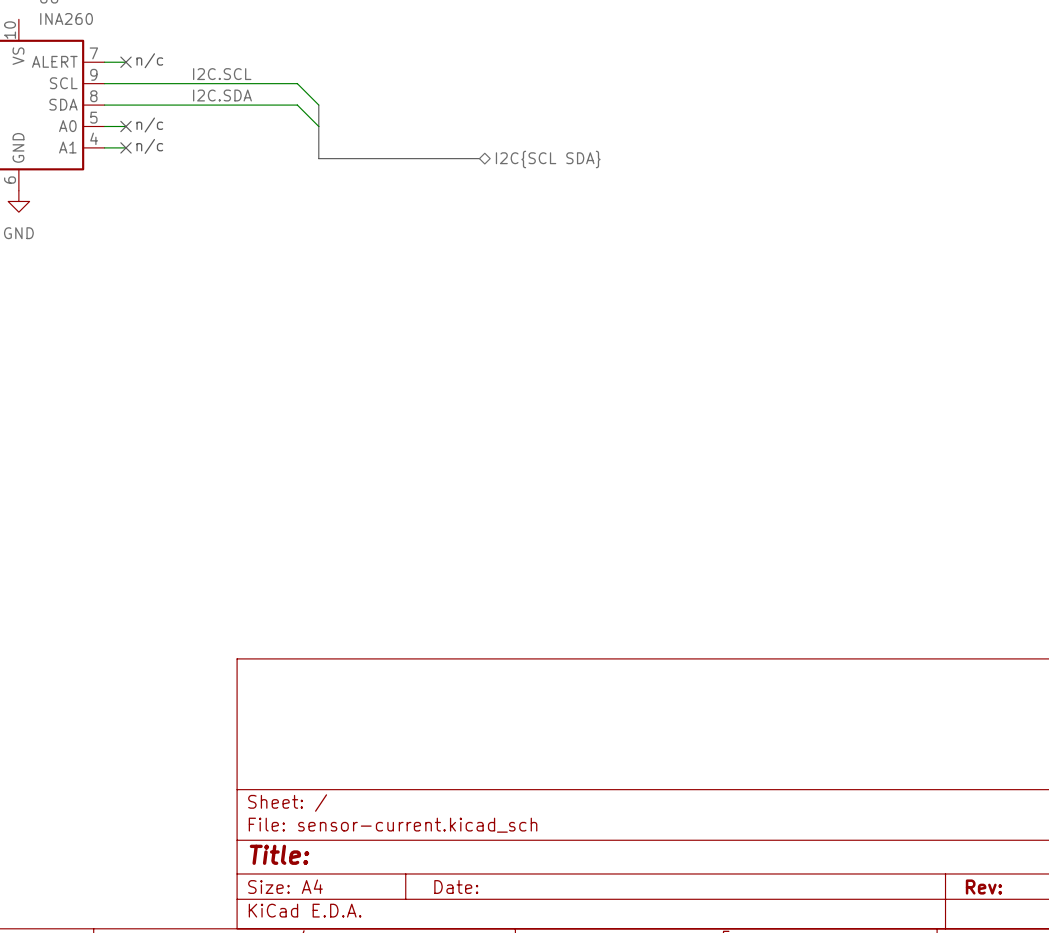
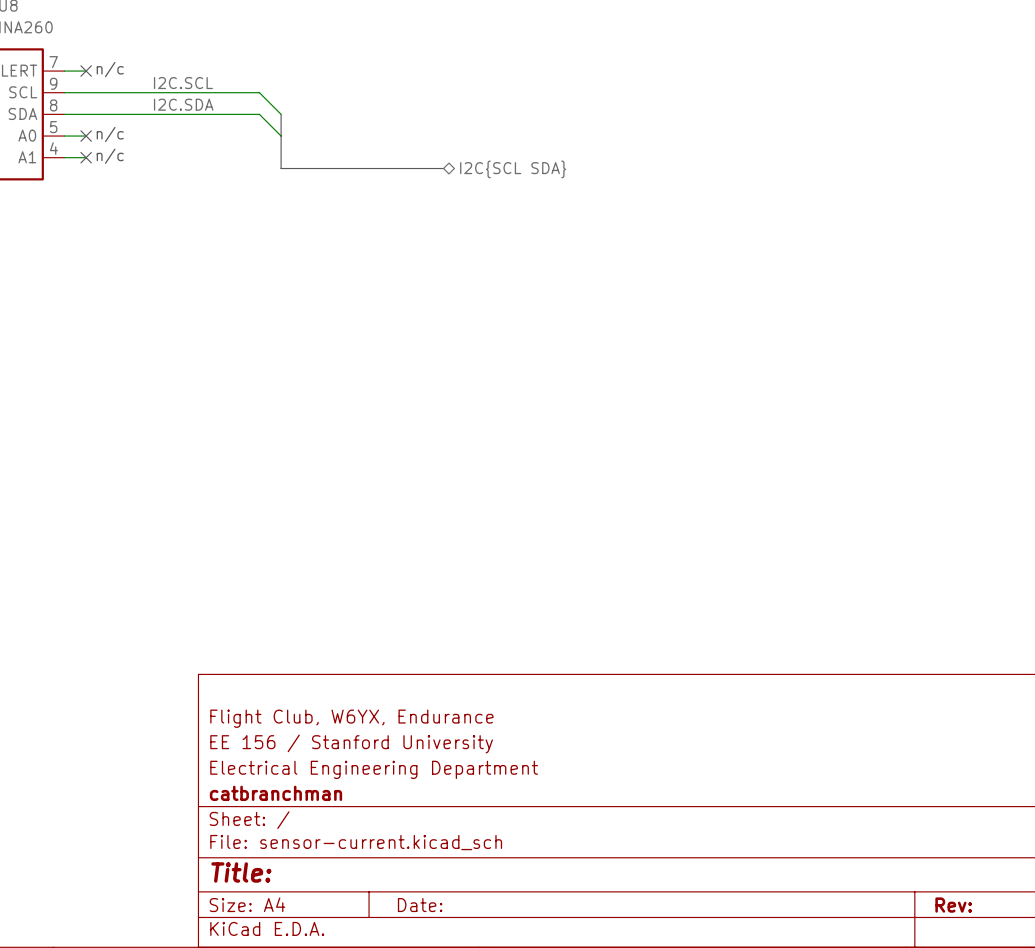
title block: none -> Flight Club, W6YX, Endurance (351, 718)
title block: none -> EE 156 / Stanford University (351, 743)
title block: none -> Electrical Engineering Department (374, 769)
title block: none -> catbranchman (275, 793)

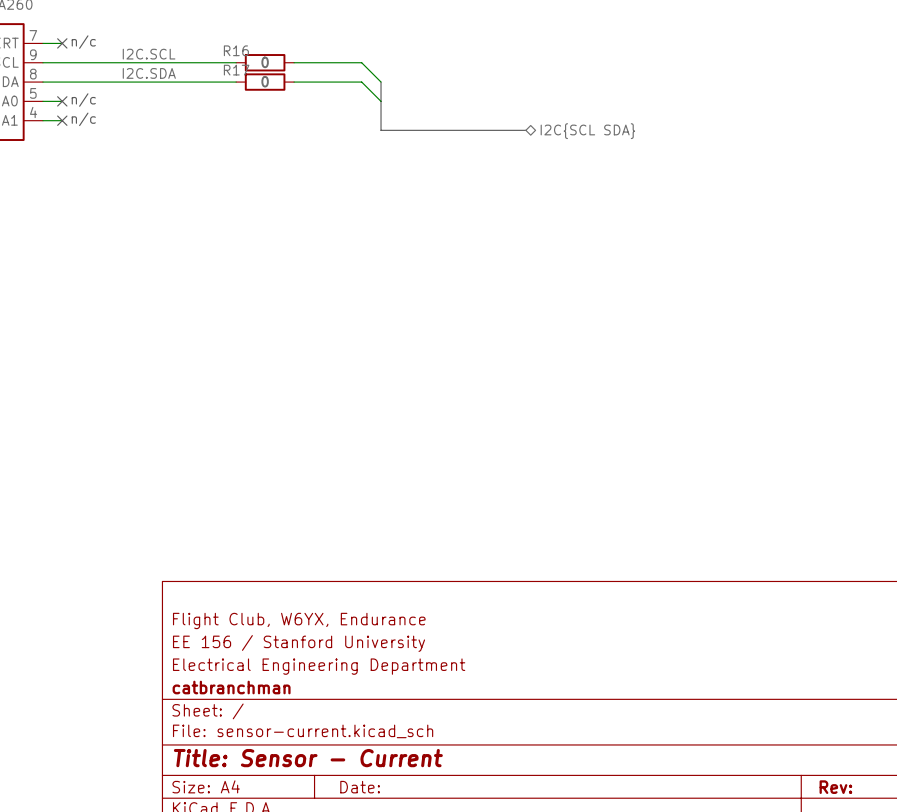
wire: (259, 92) (281, 114) -> (216, 62) (236, 62)
R16: none -> 0 (265, 62)
wire: none -> (294, 62) (361, 62) (381, 82)
wire: (259, 114) (281, 136) -> (216, 82) (236, 82)
bus: (281, 114) (281, 168) (443, 168) -> (381, 82) (381, 130) (525, 130)
R17: none -> 0 (265, 82)
wire: none -> (294, 82) (361, 82) (381, 101)
hierarchical label position: I2C{SCL SDA} (513, 169) -> I2C{SCL SDA} (587, 131)
title block: Title: (241, 872) -> Title: Sensor - Current (308, 758)

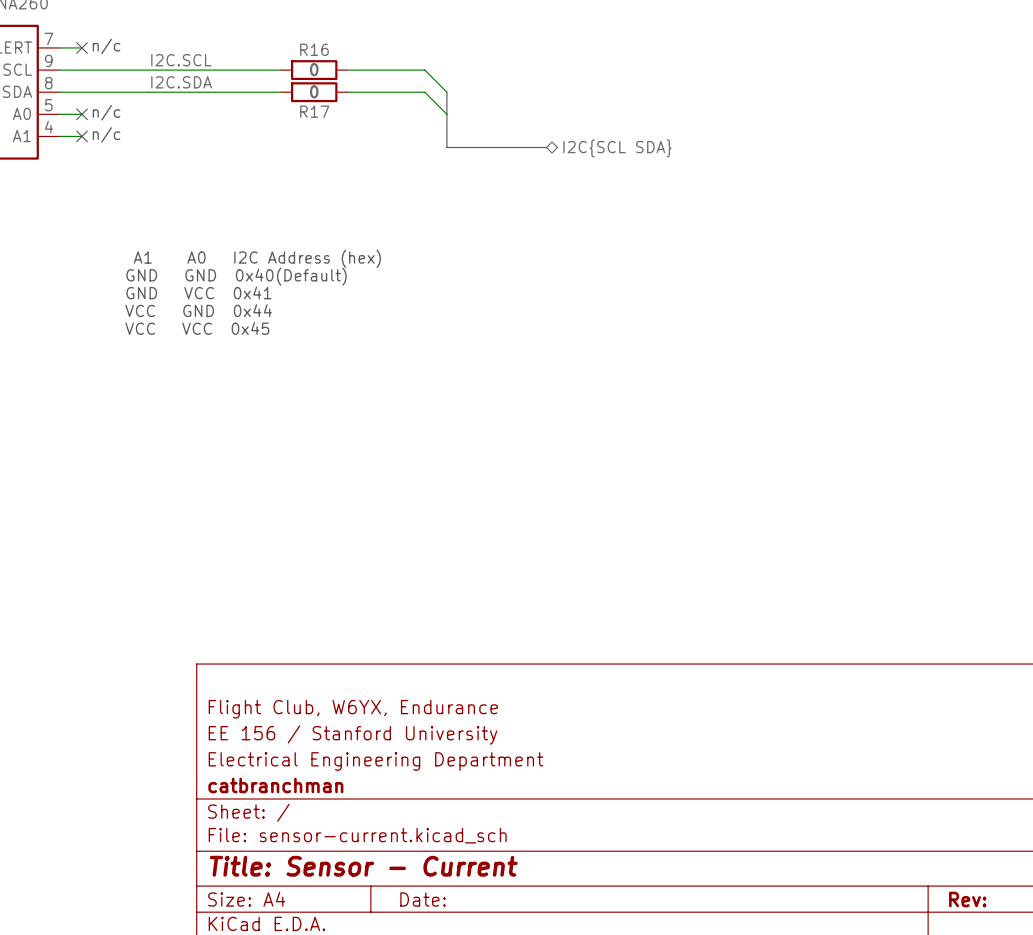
R16 name position: R16 (236, 50) -> R16 (314, 49)
R17 name position: R17 (236, 70) -> R17 (314, 111)
bus: (467, 130) (525, 130) -> none
hierarchical label position: I2C{SCL SDA} (587, 131) -> I2C{SCL SDA} (617, 148)
text: none -> A1 A0 I2C Address (hex) (257, 258)
text: none -> GND GND 0x40(Default) (236, 276)
text: none -> GND VCC 0x41 (198, 292)
text: none -> VCC GND 0x44 (198, 310)
text: none -> VCC VCC 0x45 (197, 328)

